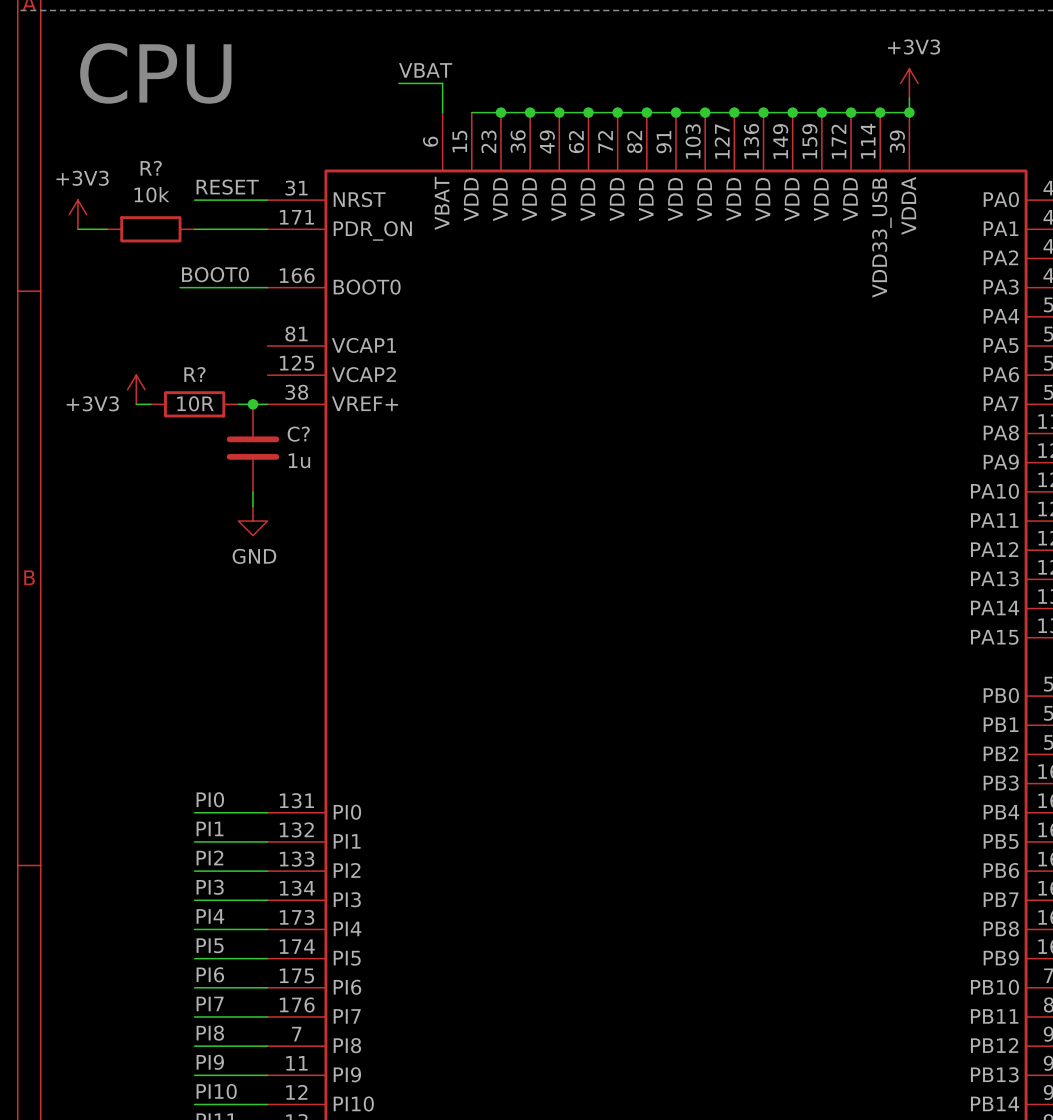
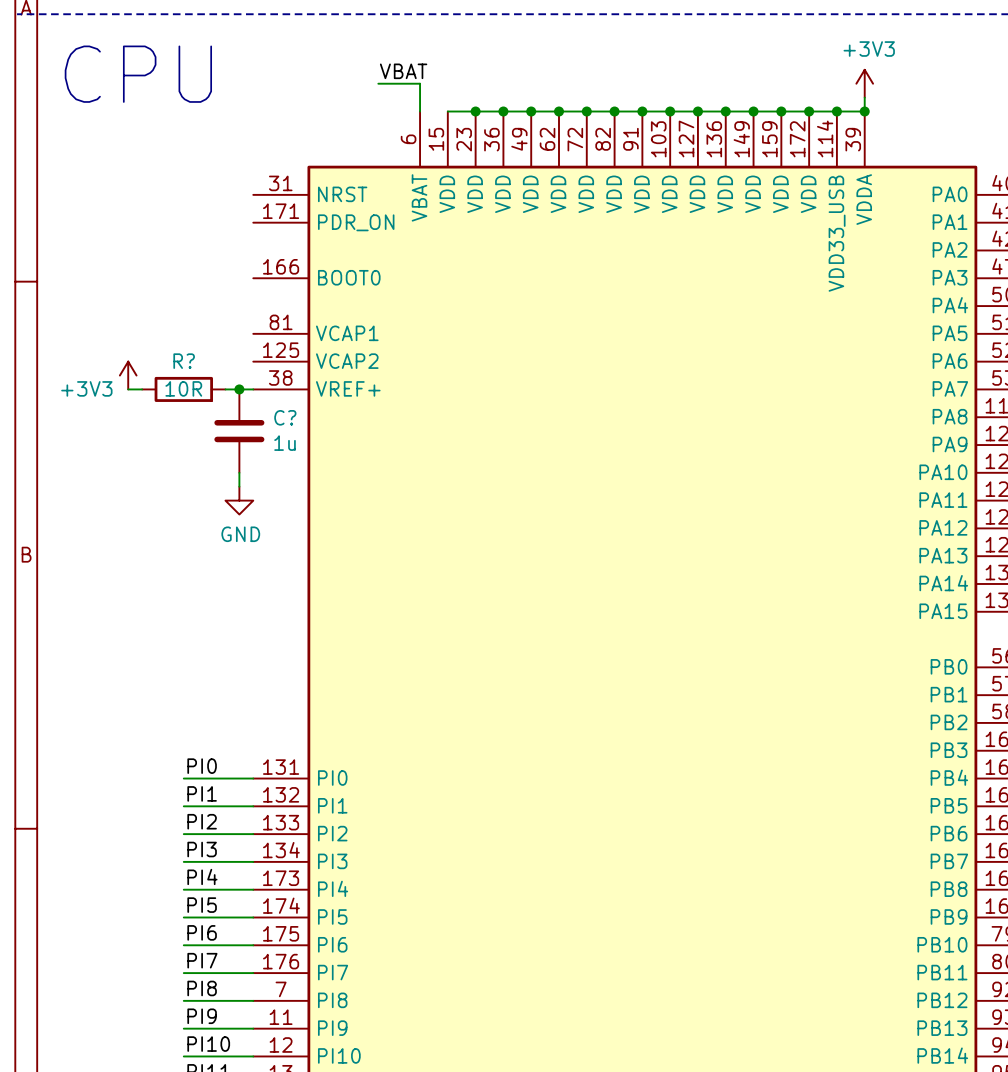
label: RESET (227, 187) -> none
wire: (194, 200) (267, 200) -> none
power symbol: +3V3 (77, 214) -> none
wire: (77, 229) (107, 229) -> none
R?: 10k (150, 229) -> none
wire: (194, 229) (267, 229) -> none
label: BOOT0 (215, 274) -> none
wire: (180, 287) (267, 287) -> none

